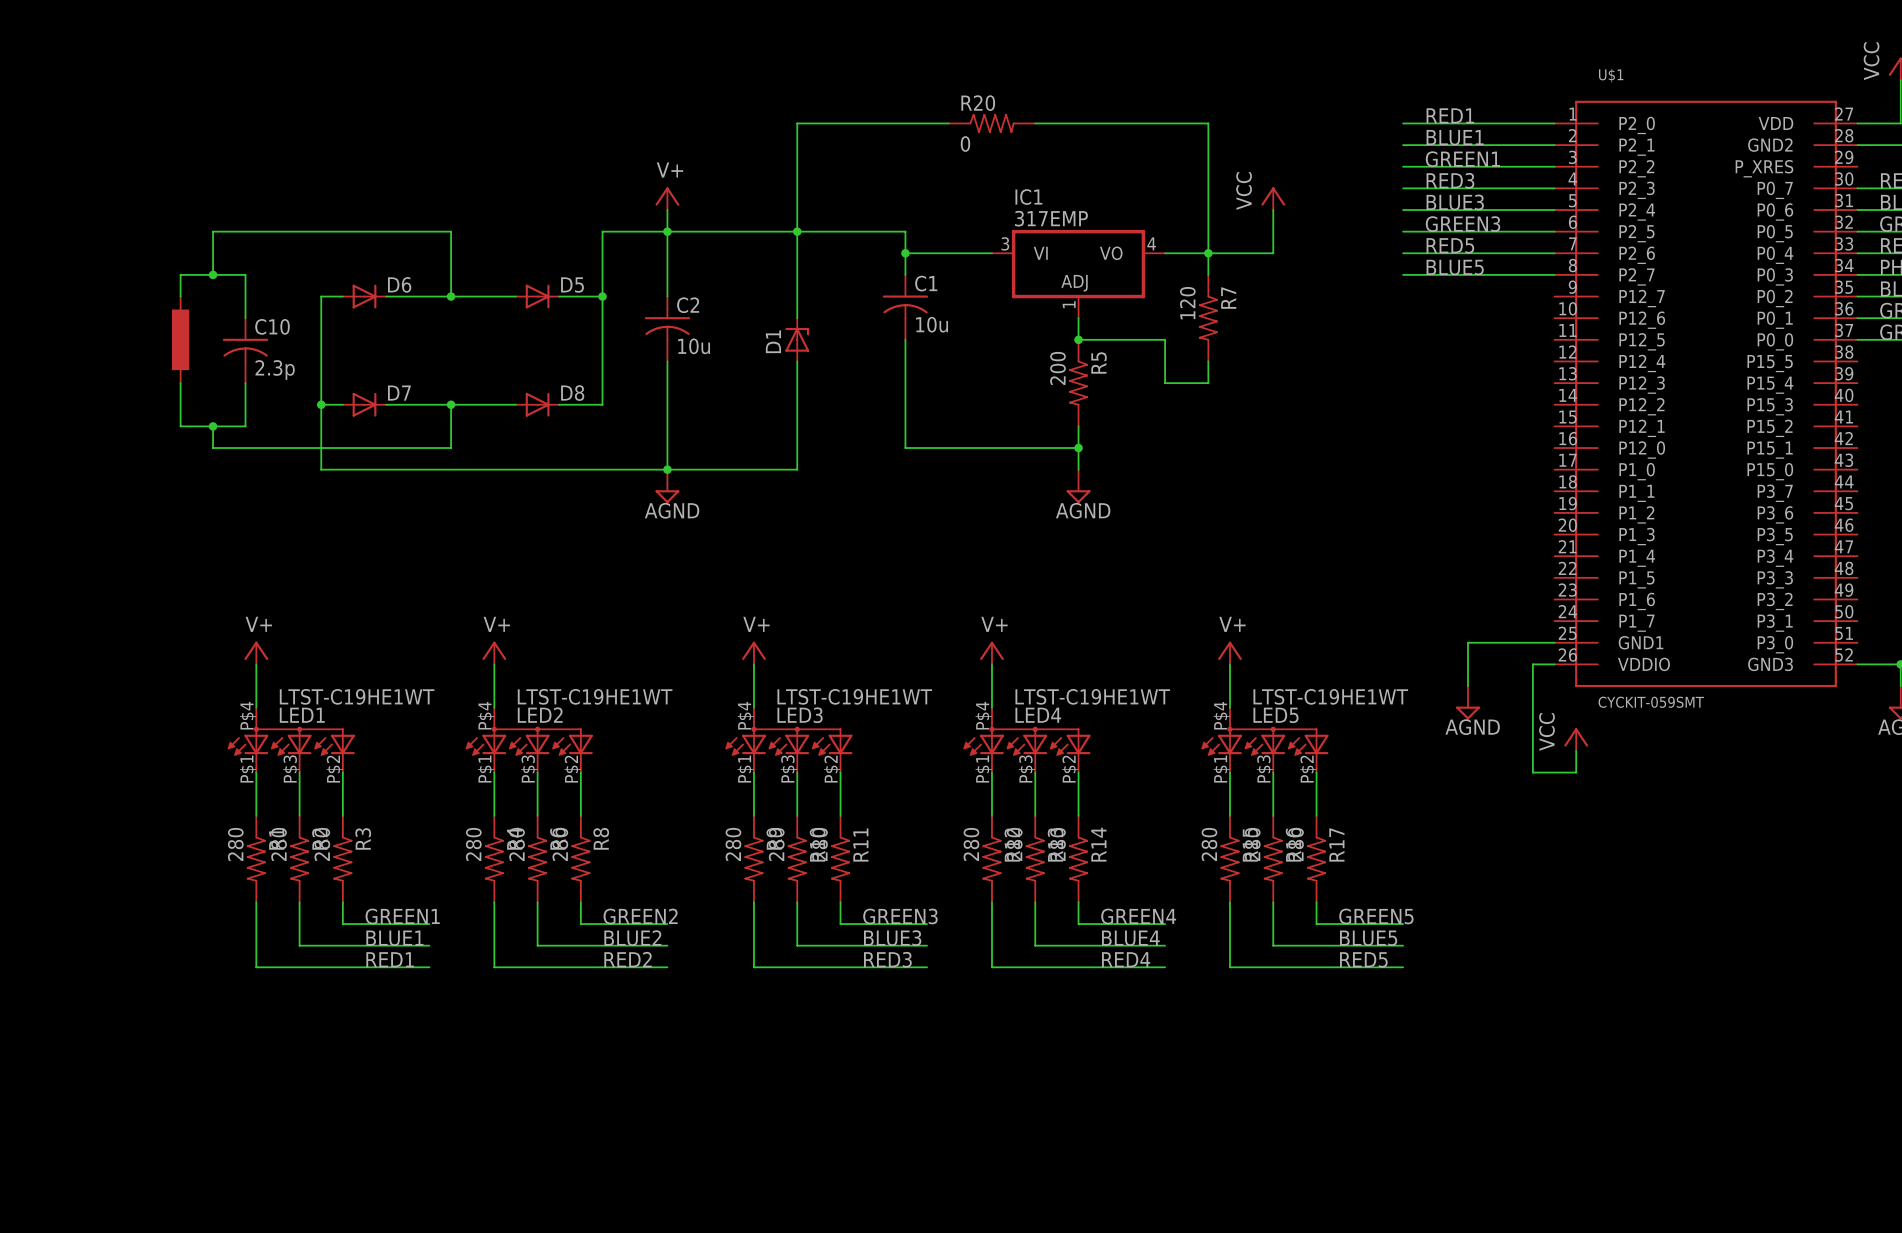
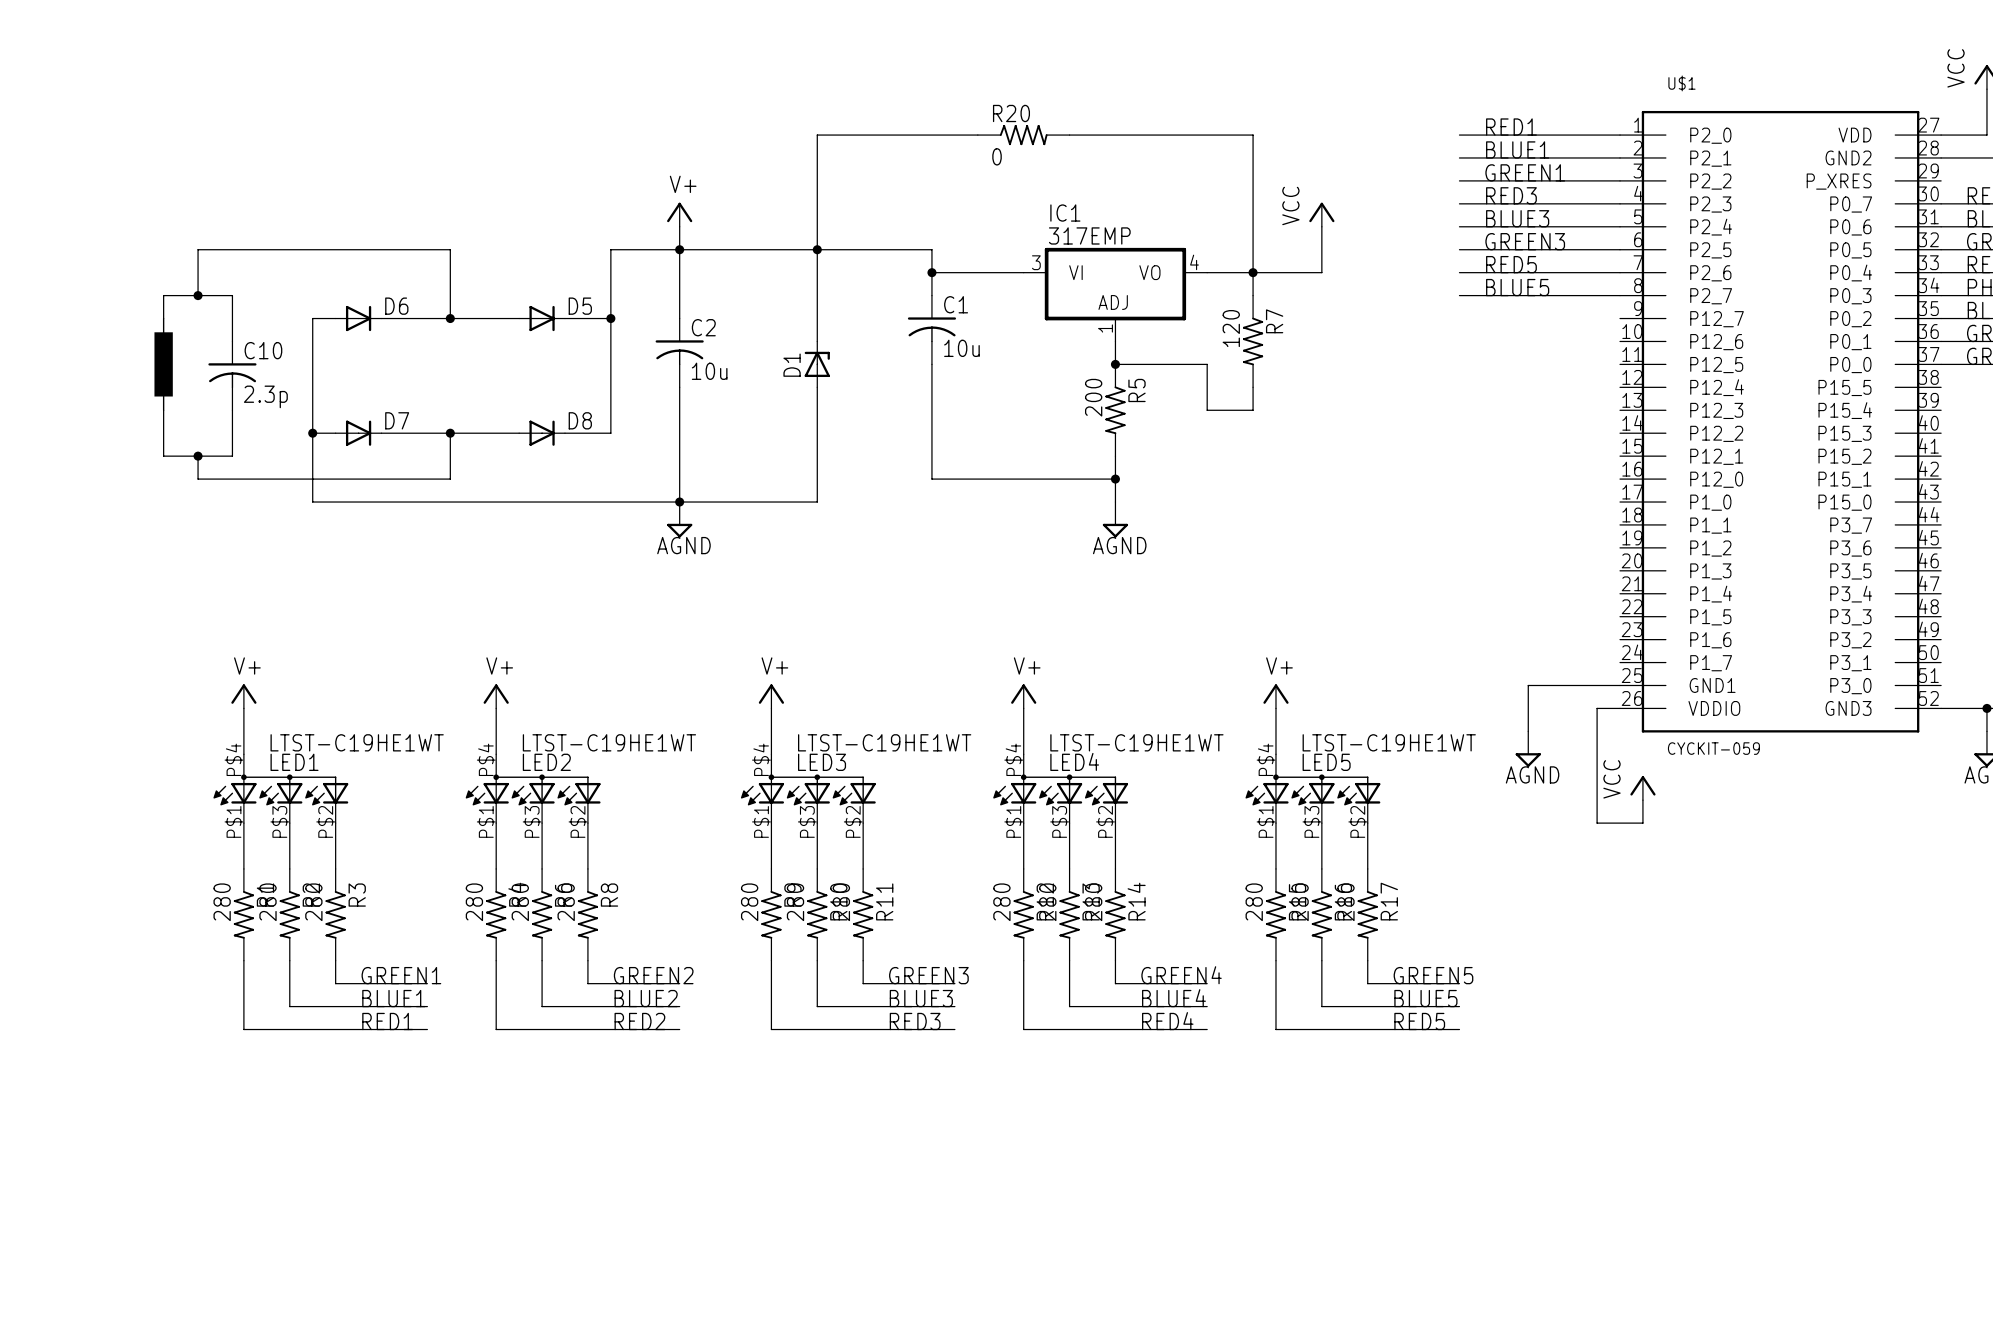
U$1 value: CYCKIT-059SMT (1651, 702) -> CYCKIT-059 (1713, 748)

